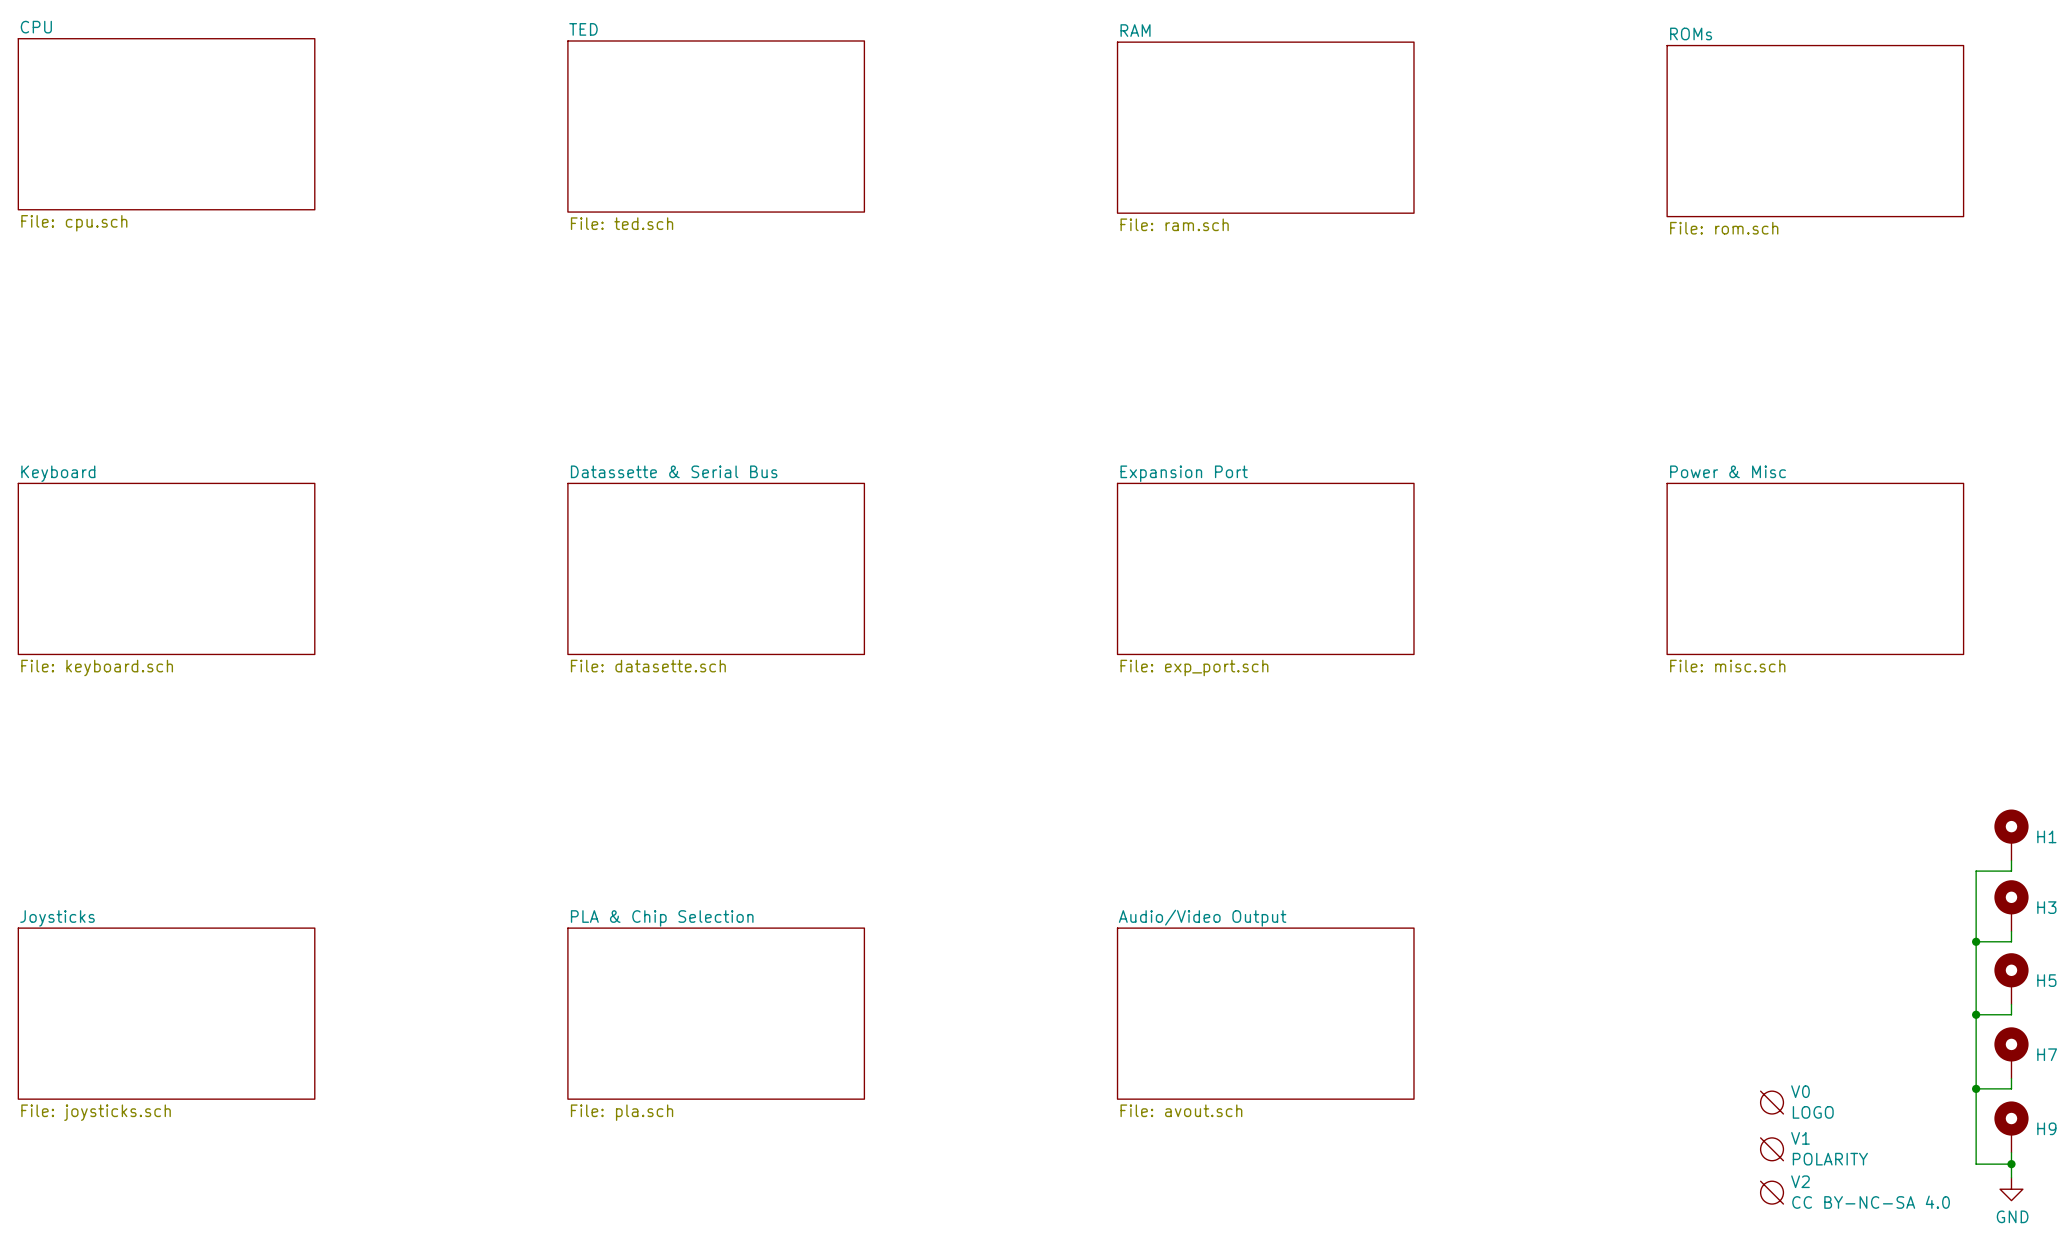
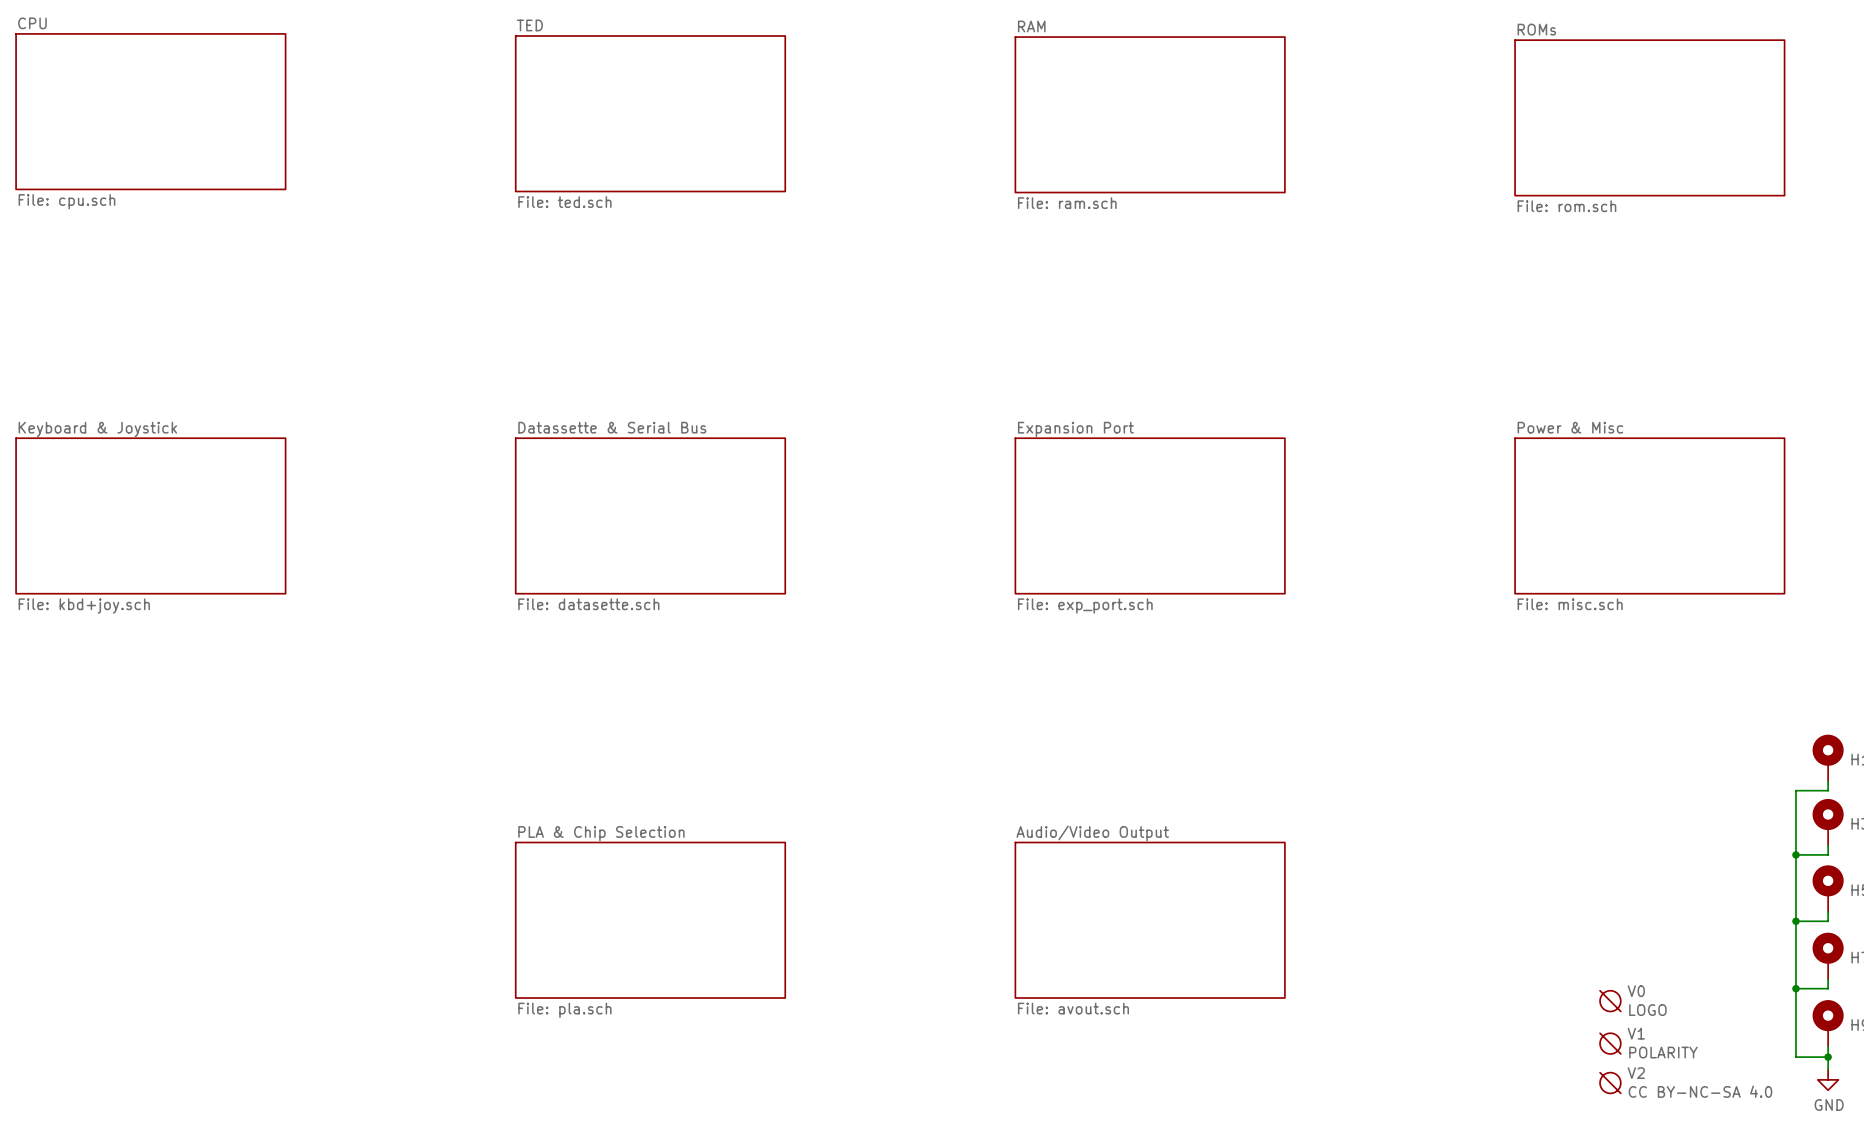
sheet Keyboard name: Keyboard (58, 473) -> Keyboard & Joystick (97, 429)
sheet Keyboard value: File: keyboard.sch (97, 667) -> File: kbd+joy.sch (84, 606)
sheet Joysticks: File: joysticks.sch (166, 1013) -> none

